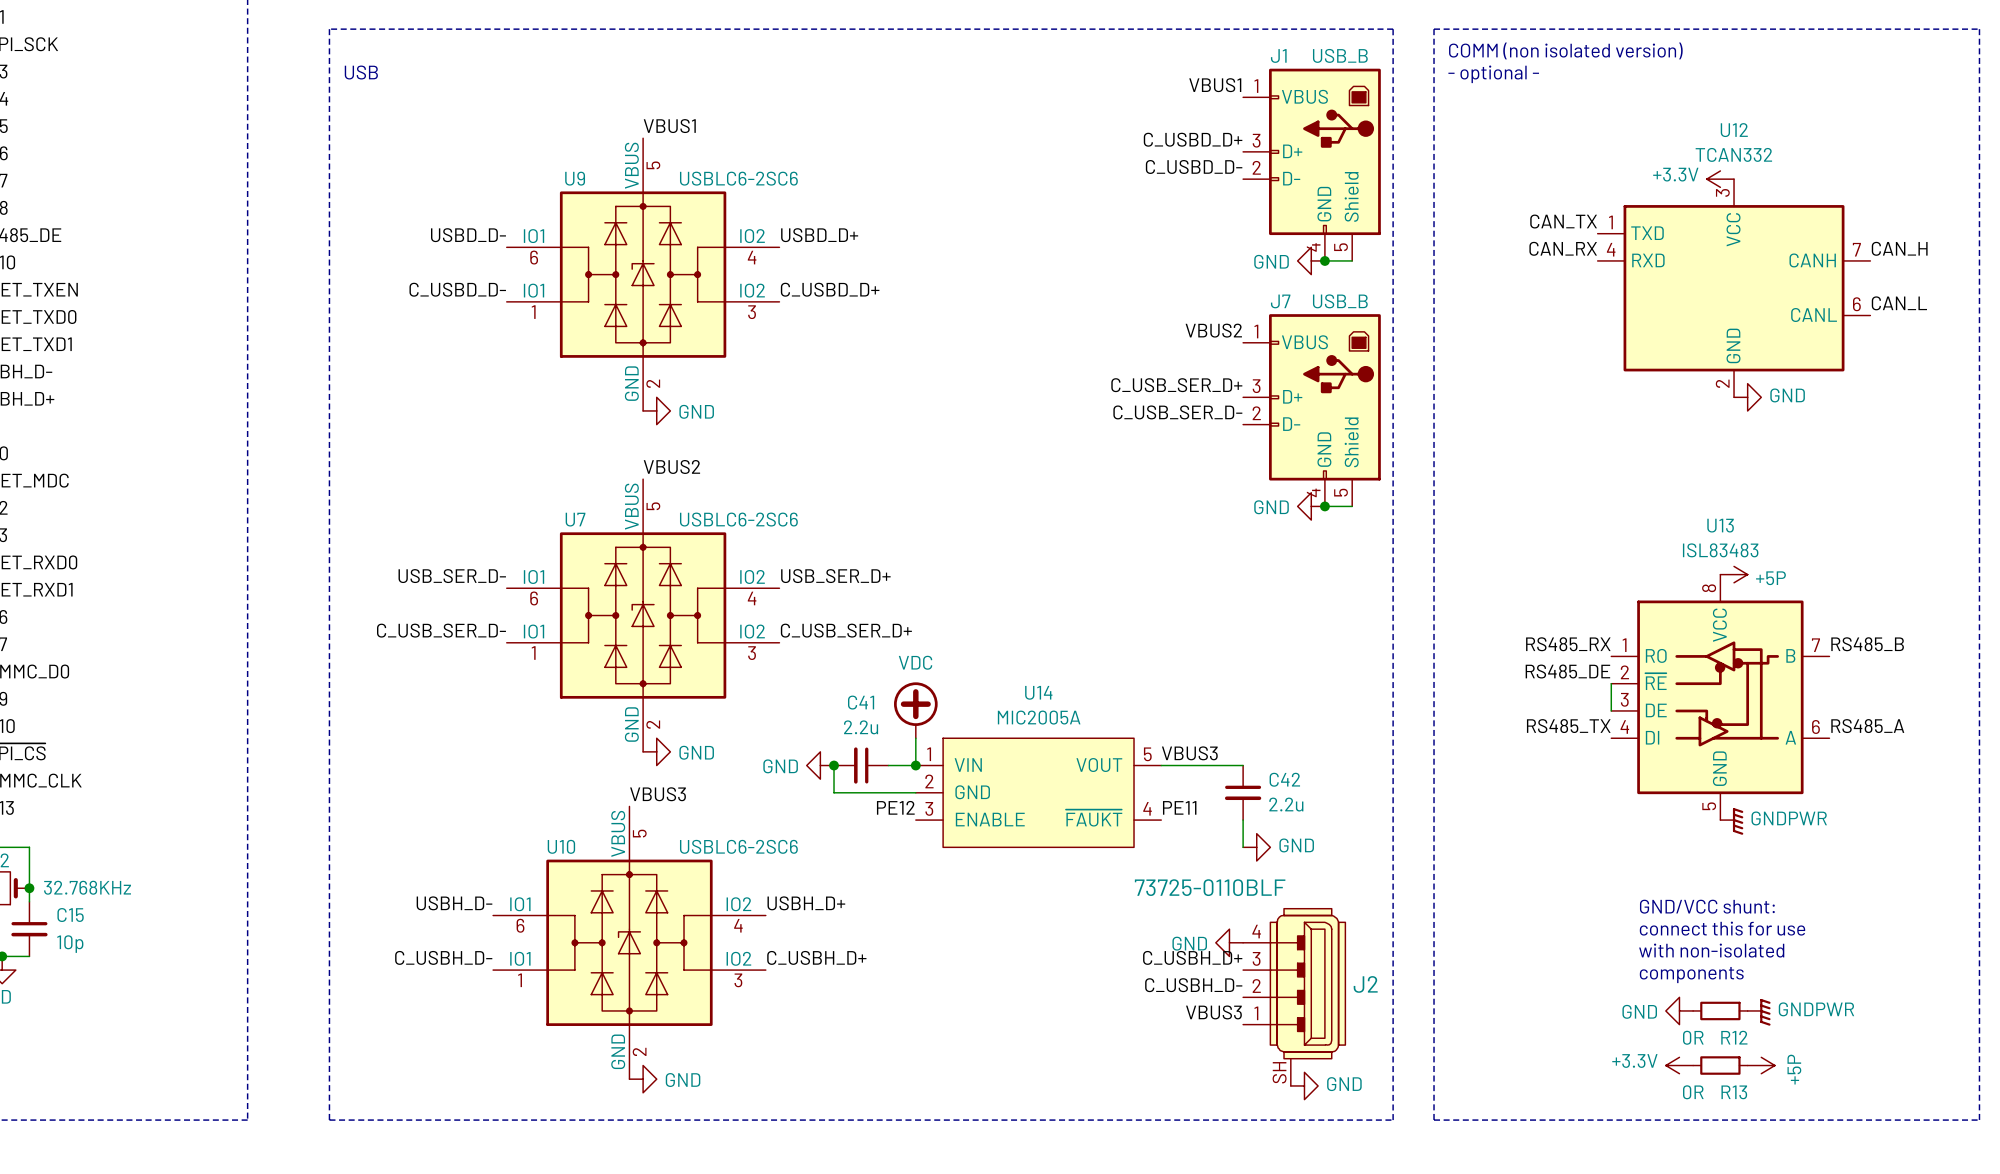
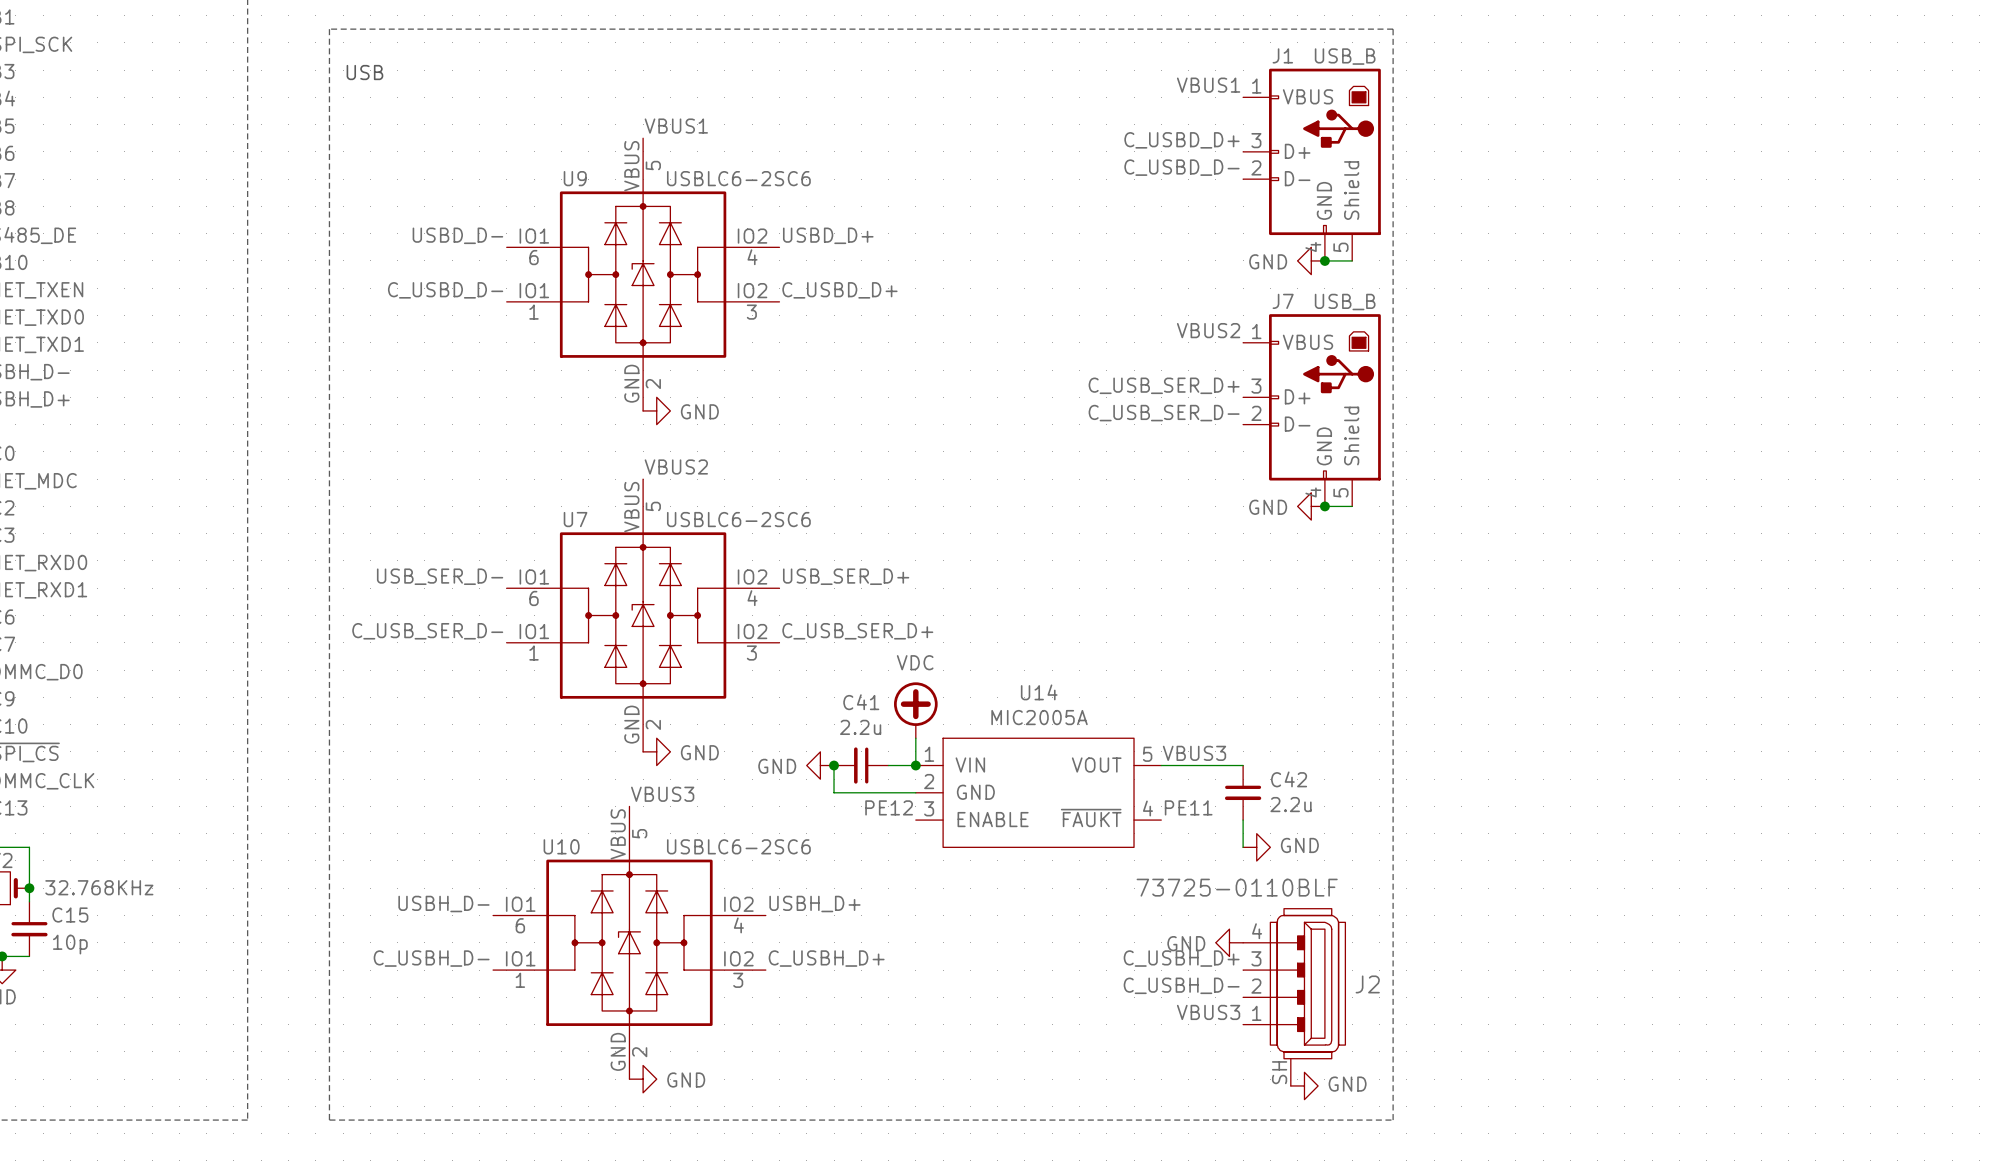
line: (1434, 29) (1979, 29) (1979, 1120) (1434, 1120) (1434, 29) -> none
text: COMM (non isolated version) (1565, 50) -> none
text: - optional - (1493, 74) -> none
power symbol: +3.3V (1720, 179) -> none
label: CAN_TX (1563, 221) -> none
label: CAN_RX (1563, 248) -> none
label: CAN_H (1899, 248) -> none
U12: TCAN332 (1734, 288) -> none
label: CAN_L (1899, 303) -> none
power symbol: GND (1747, 397) -> none
power symbol: +5P (1734, 574) -> none
label: RS485_RX (1568, 644) -> none
label: RS485_B (1867, 644) -> none
label: RS485_DE (1567, 671) -> none
wire: (1611, 683) (1611, 710) -> none
U13: ISL83483 (1720, 697) -> none
label: RS485_TX (1568, 726) -> none
label: RS485_A (1867, 726) -> none
power symbol: GNDPWR (1731, 821) -> none
text: GND/VCC shunt: (1707, 906) -> none
text: connect this for use (1722, 928) -> none
text: with non-isolated (1711, 950) -> none
text: components (1691, 975) -> none
power symbol: GND (1679, 1010) -> none
R12: 0R (1720, 1010) -> none
power symbol: GNDPWR (1759, 1012) -> none
power symbol: +3.3V (1679, 1065) -> none
R13: 0R (1720, 1065) -> none
power symbol: +5P (1761, 1065) -> none

